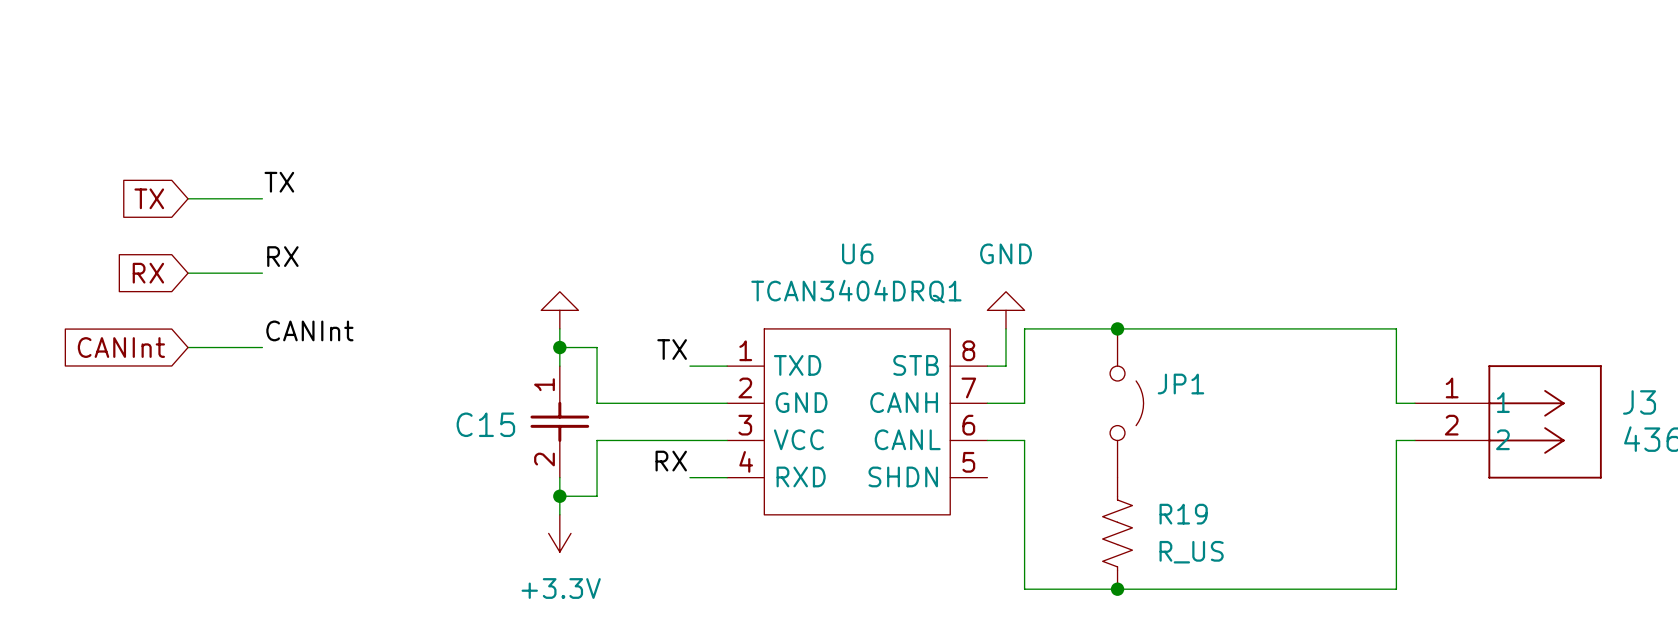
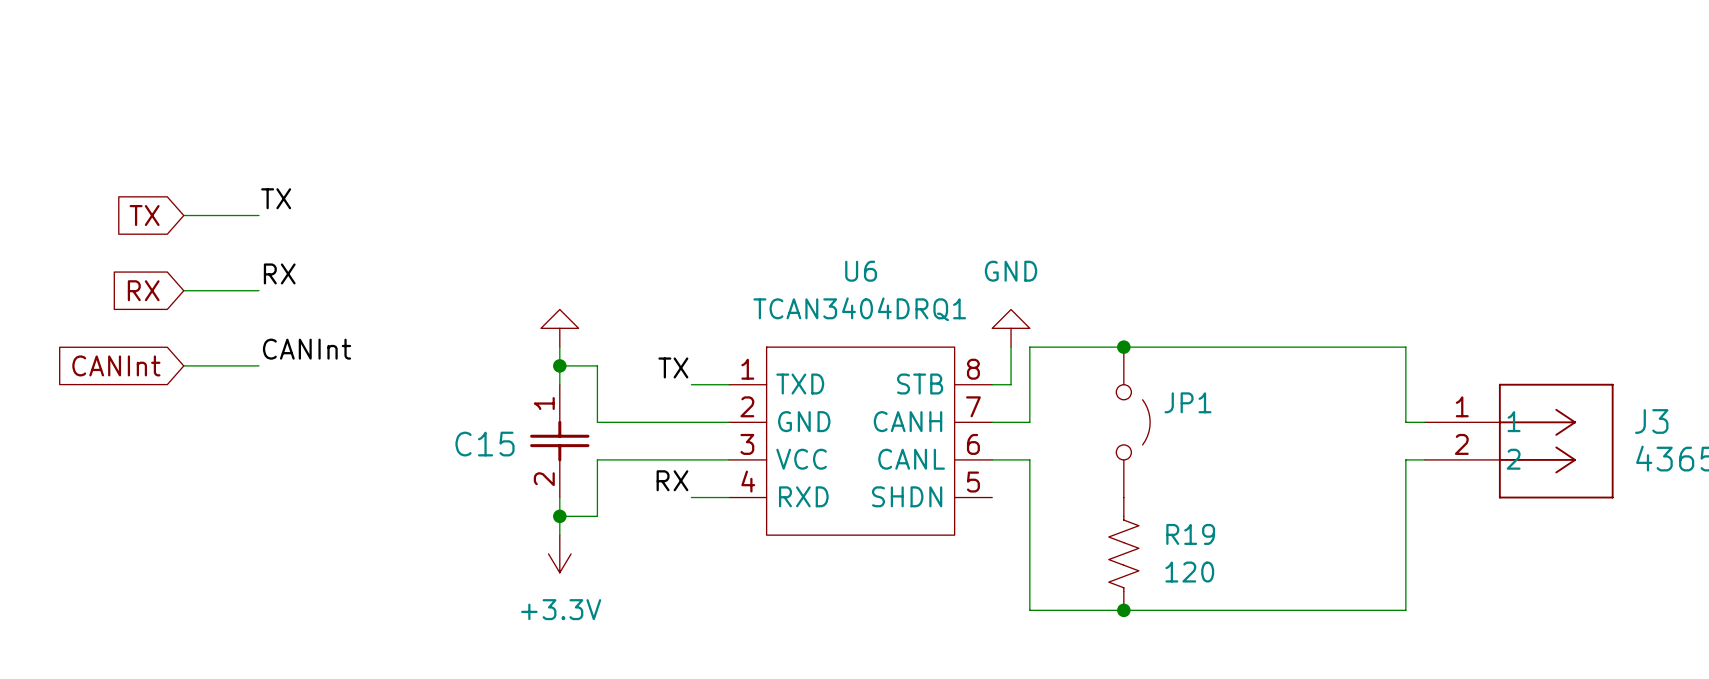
R19 value: R_US (1191, 552) -> 120 (1189, 572)

